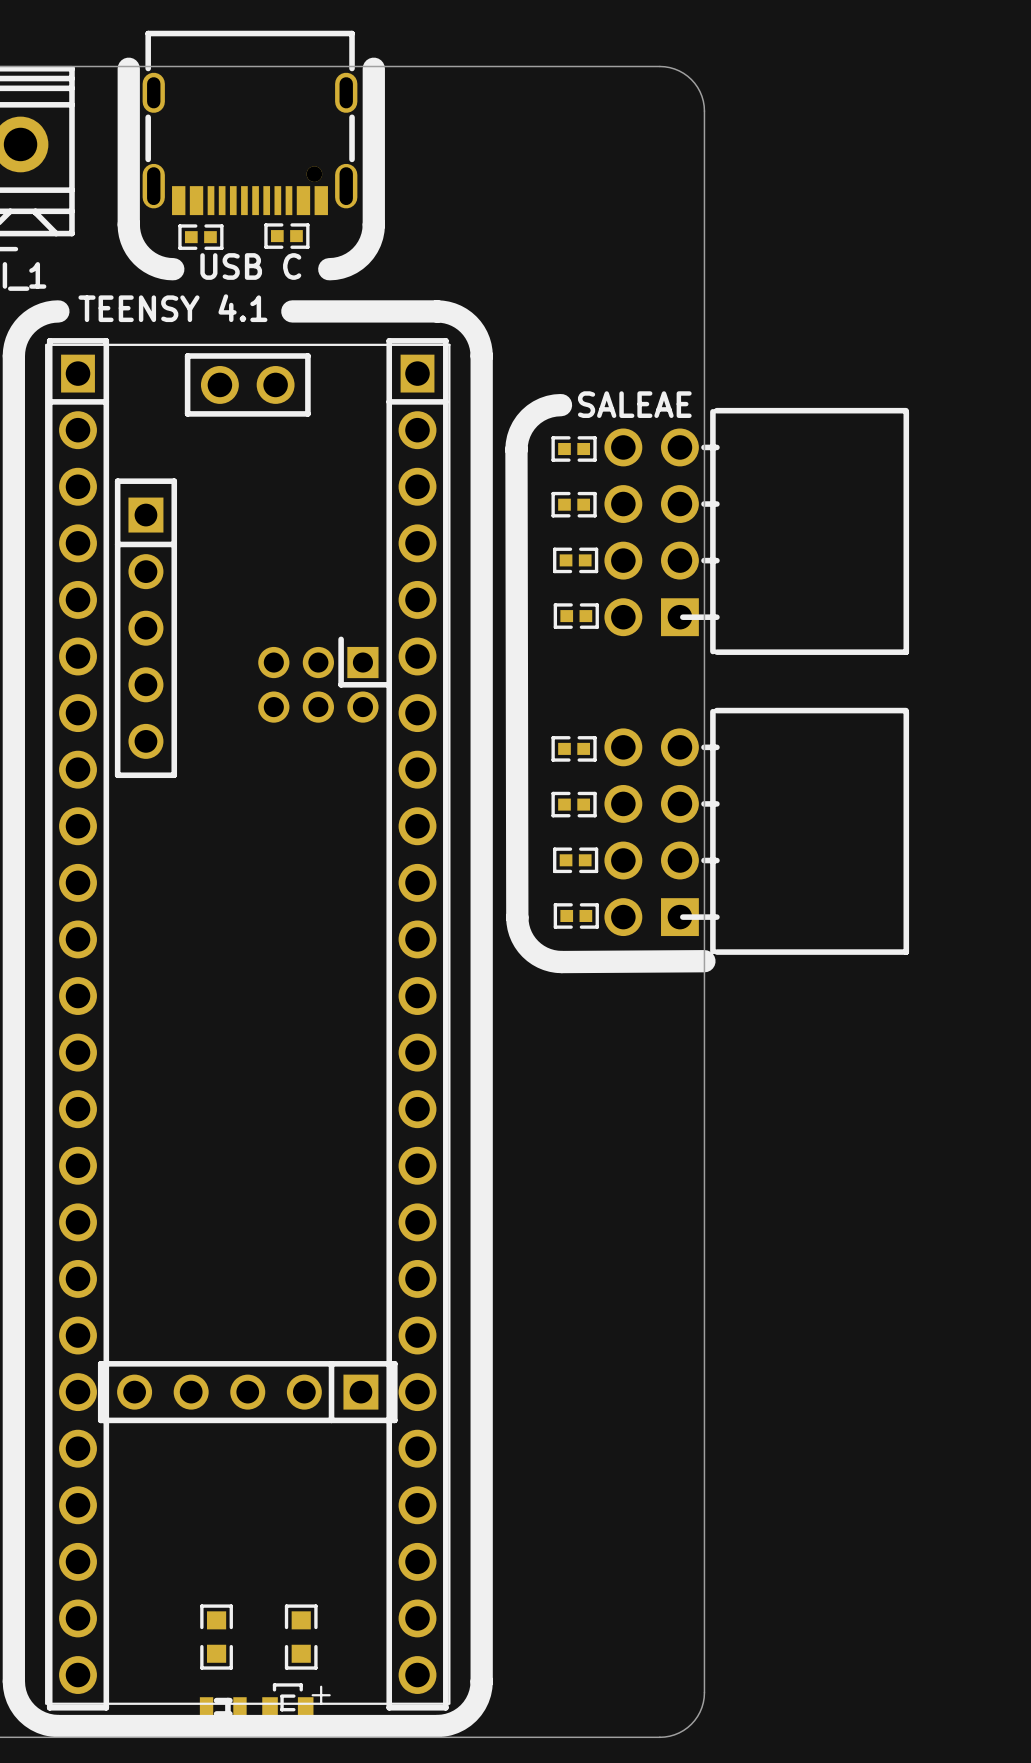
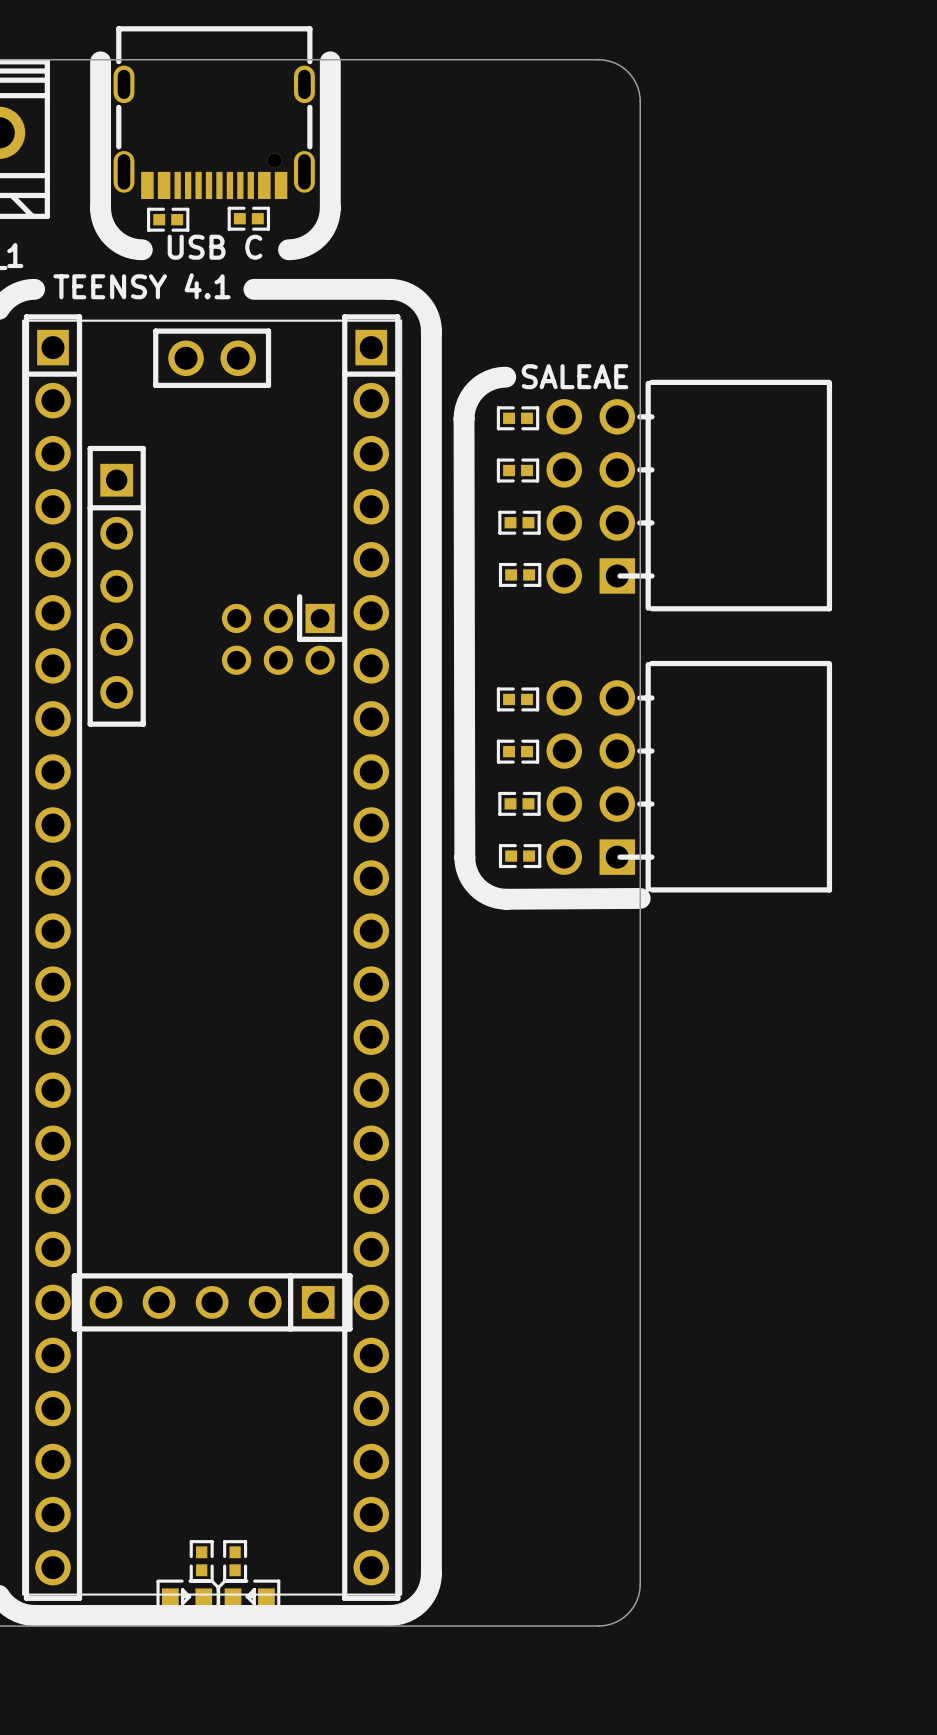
part: (216, 1637) -> none
part: (301, 1637) -> none
part: none -> (201, 1561)
part: none -> (235, 1561)
part footprint: [262, 1683, 314, 1716] -> [217, 1579, 281, 1615]
part footprint: [199, 1697, 247, 1728] -> [156, 1579, 220, 1615]

